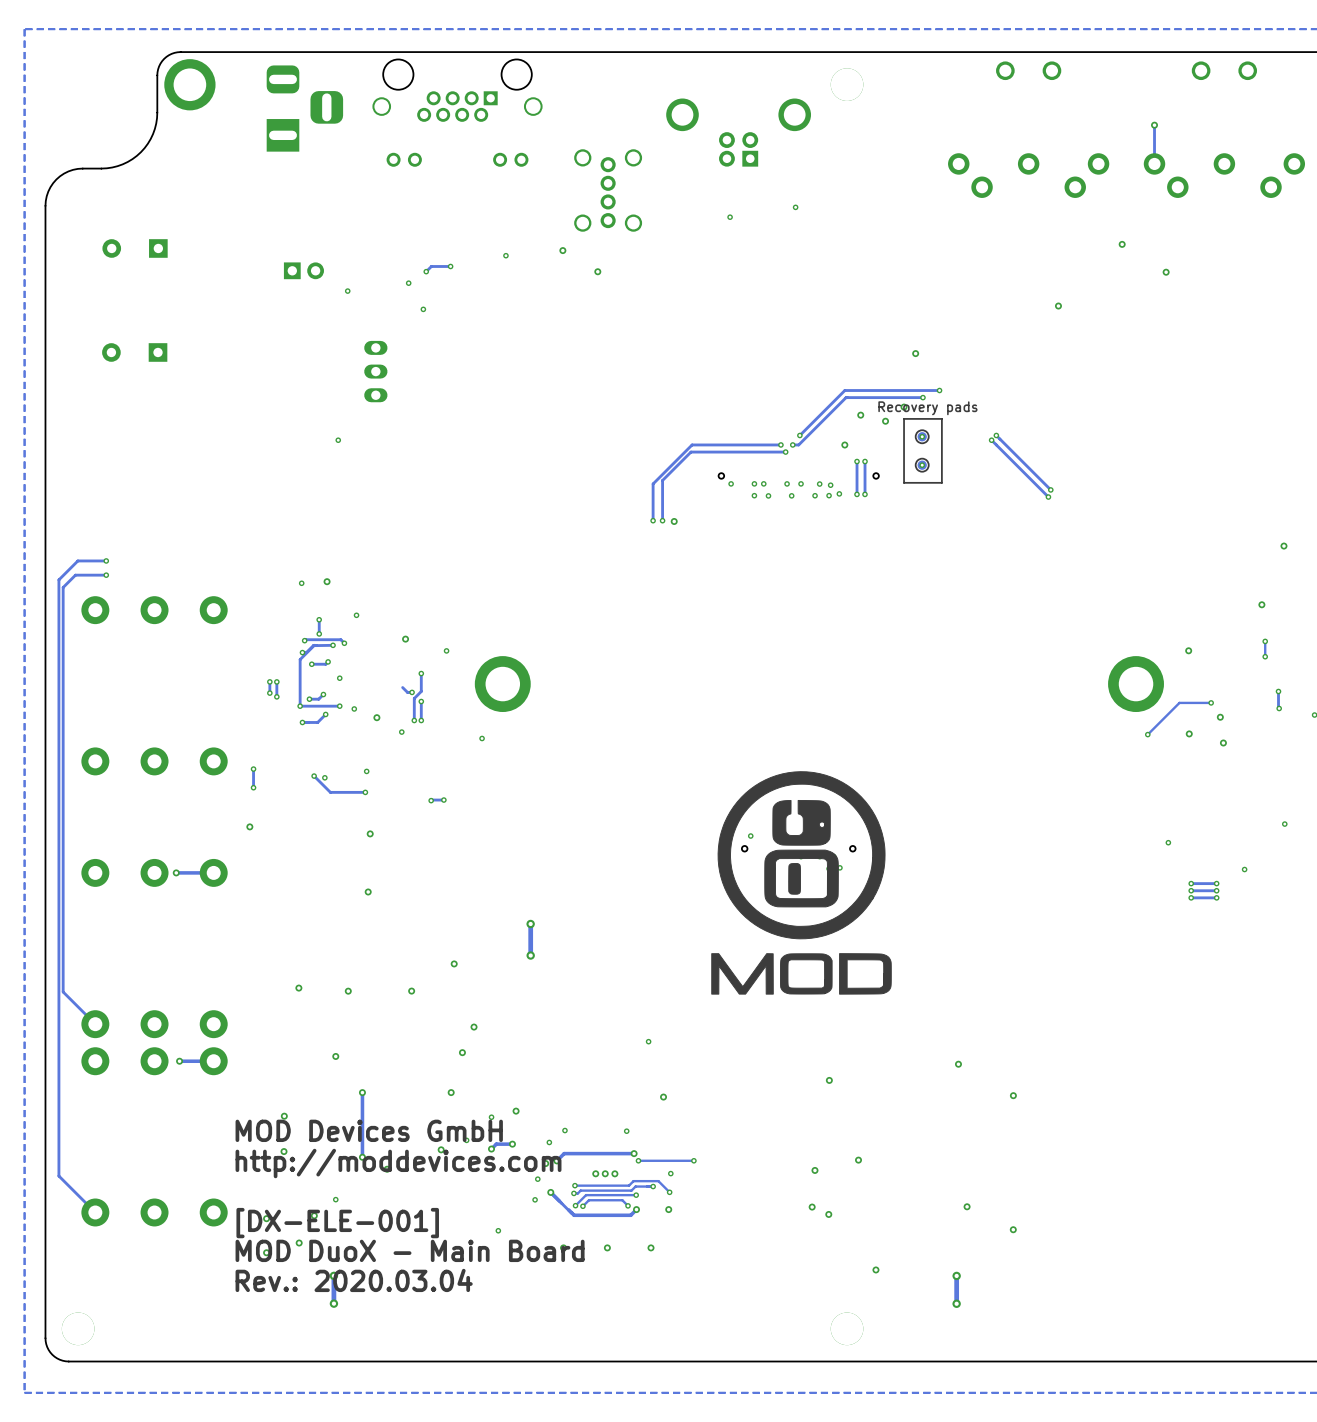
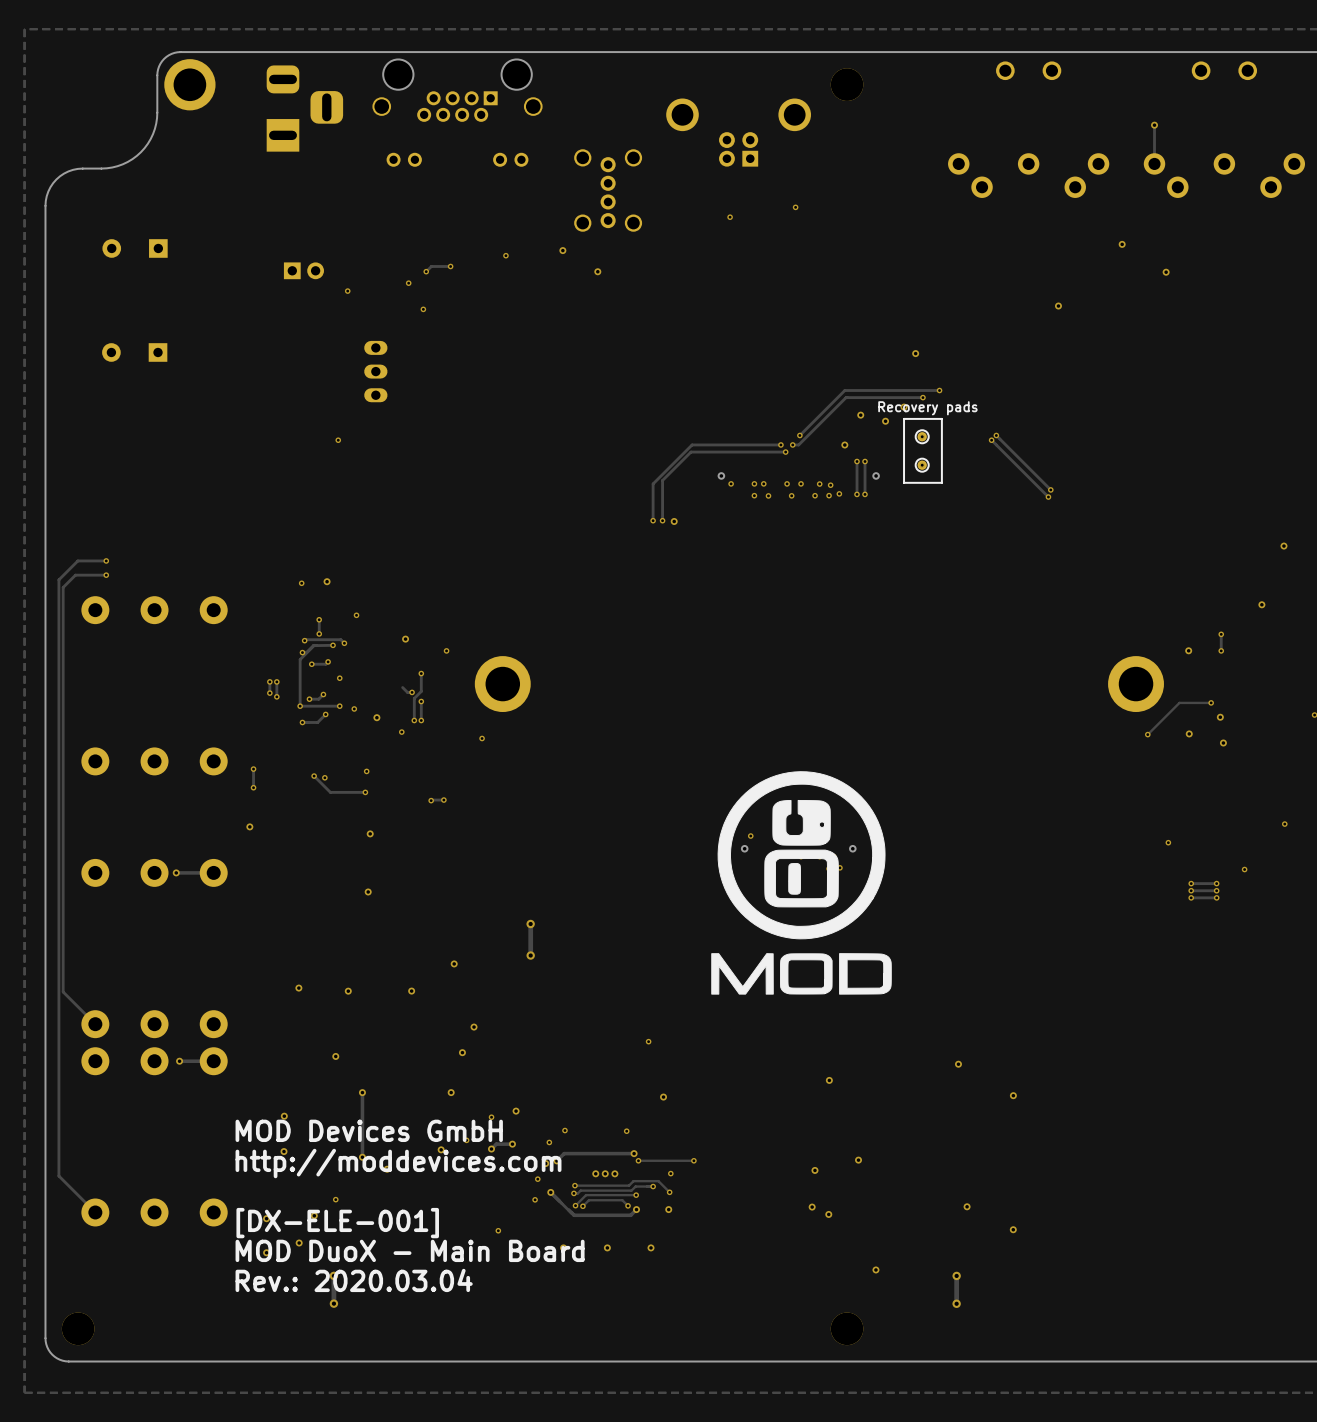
track: none -> (1221, 634) (1221, 650)
via: none -> (1221, 634)
track: (1265, 641) (1265, 656) -> none
via: (1265, 641) -> none
via: none -> (1221, 650)
via: (1265, 656) -> none
track: (1278, 691) (1279, 708) -> none
via: (1278, 691) -> none
via: (1279, 708) -> none

